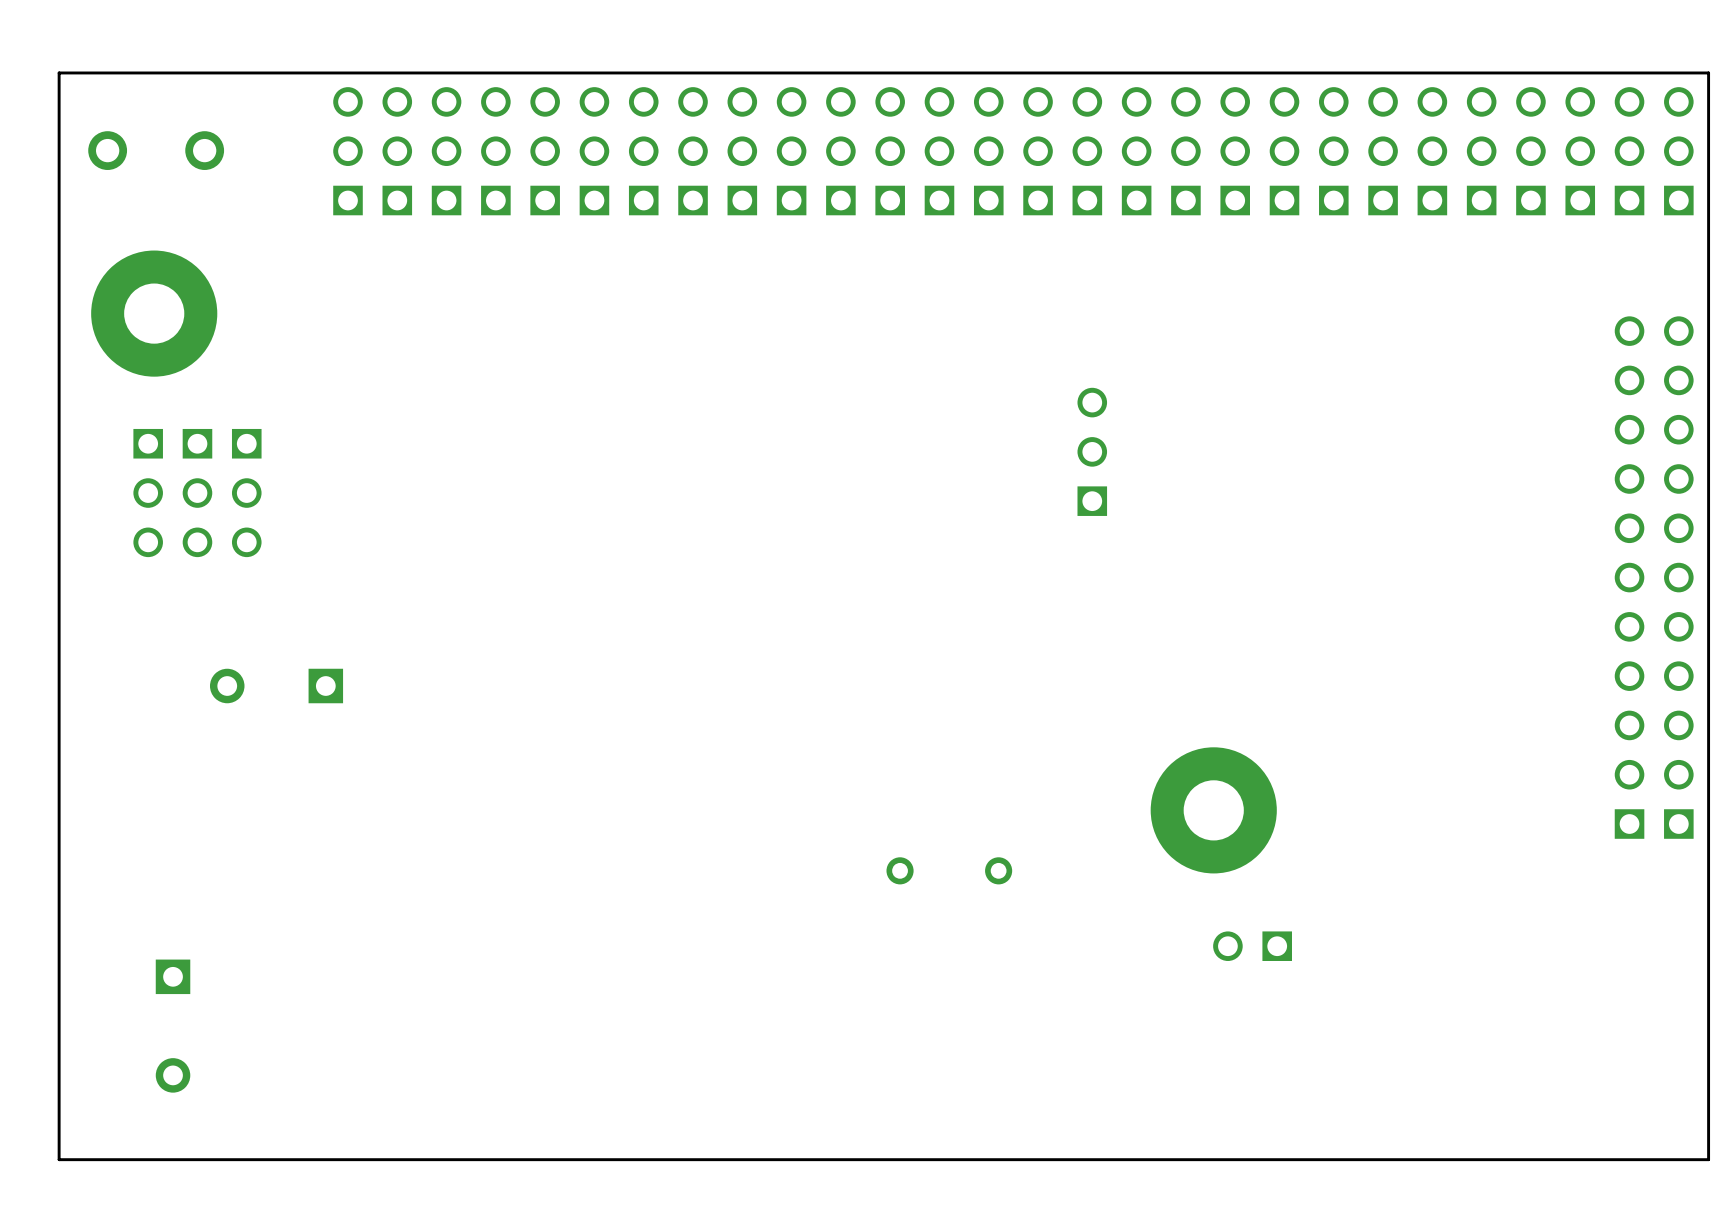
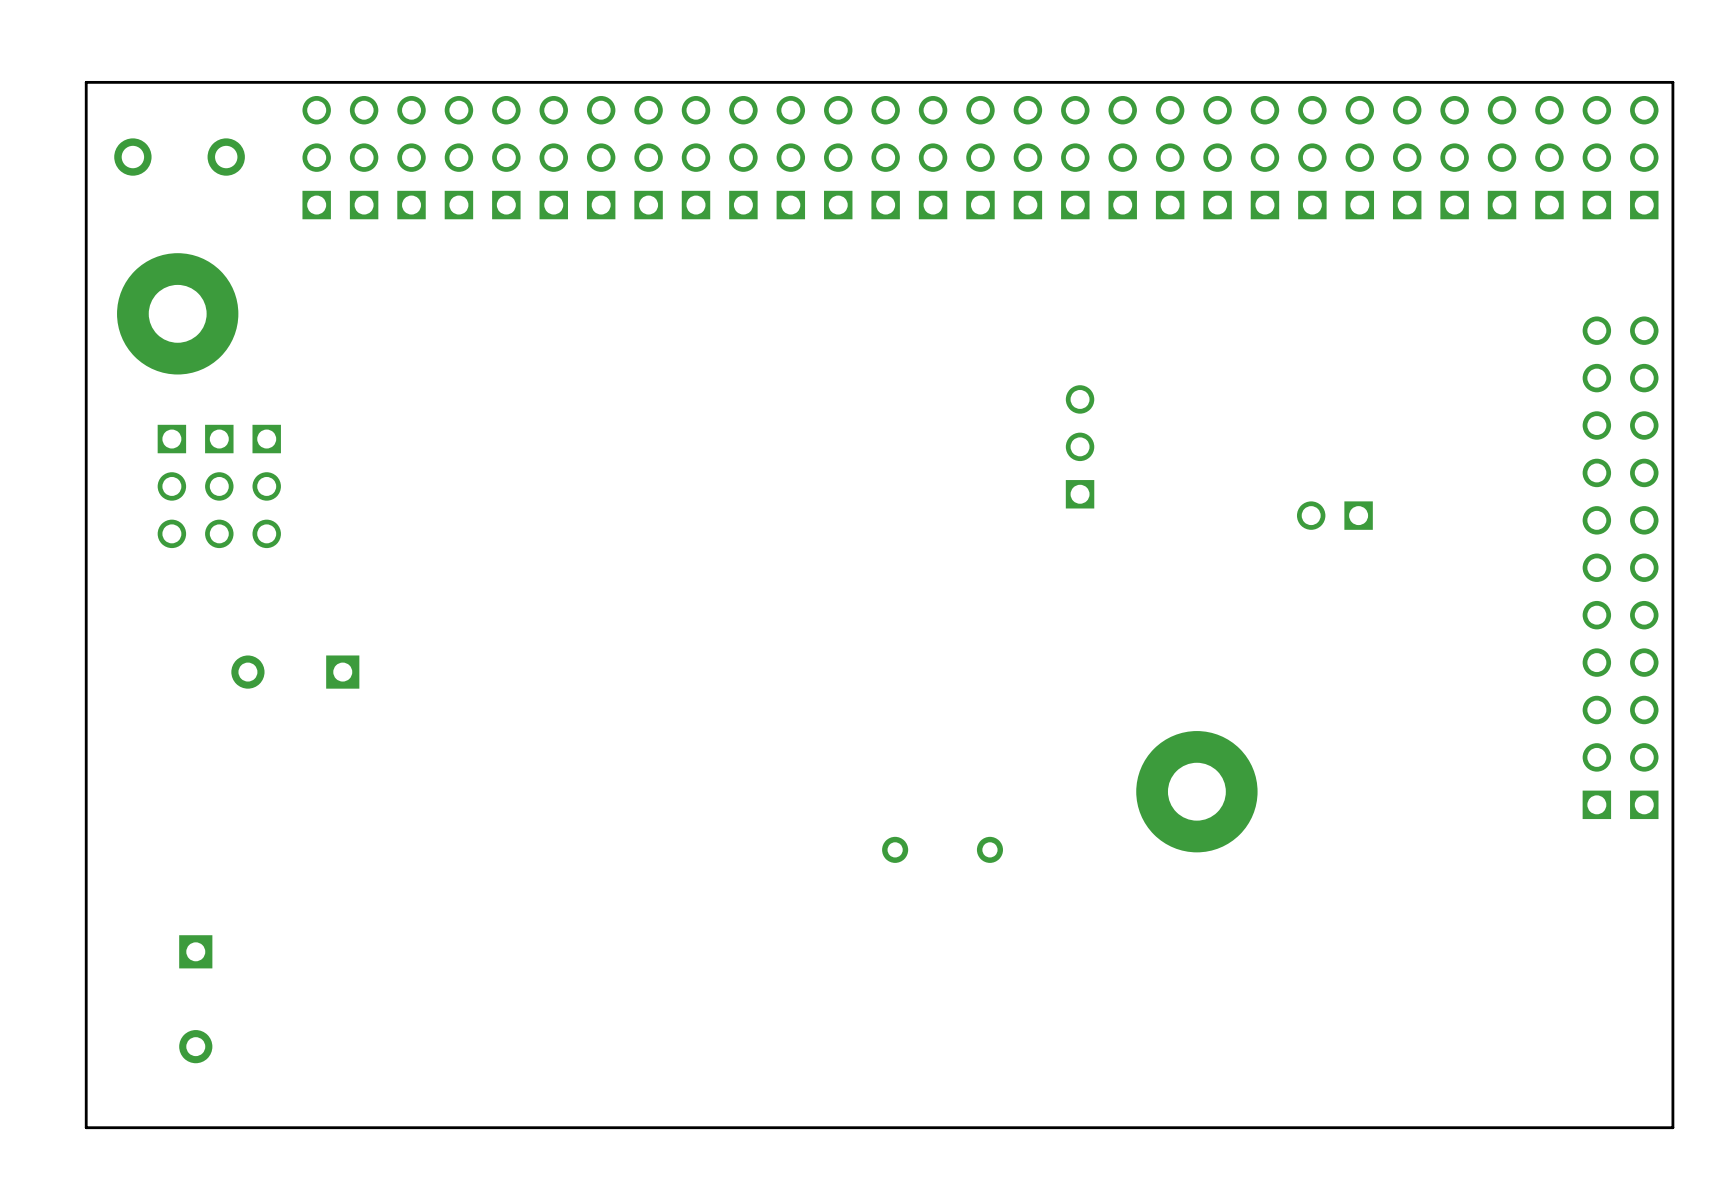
part: none -> (316, 157)
part position: (1252, 946) -> (1334, 515)

